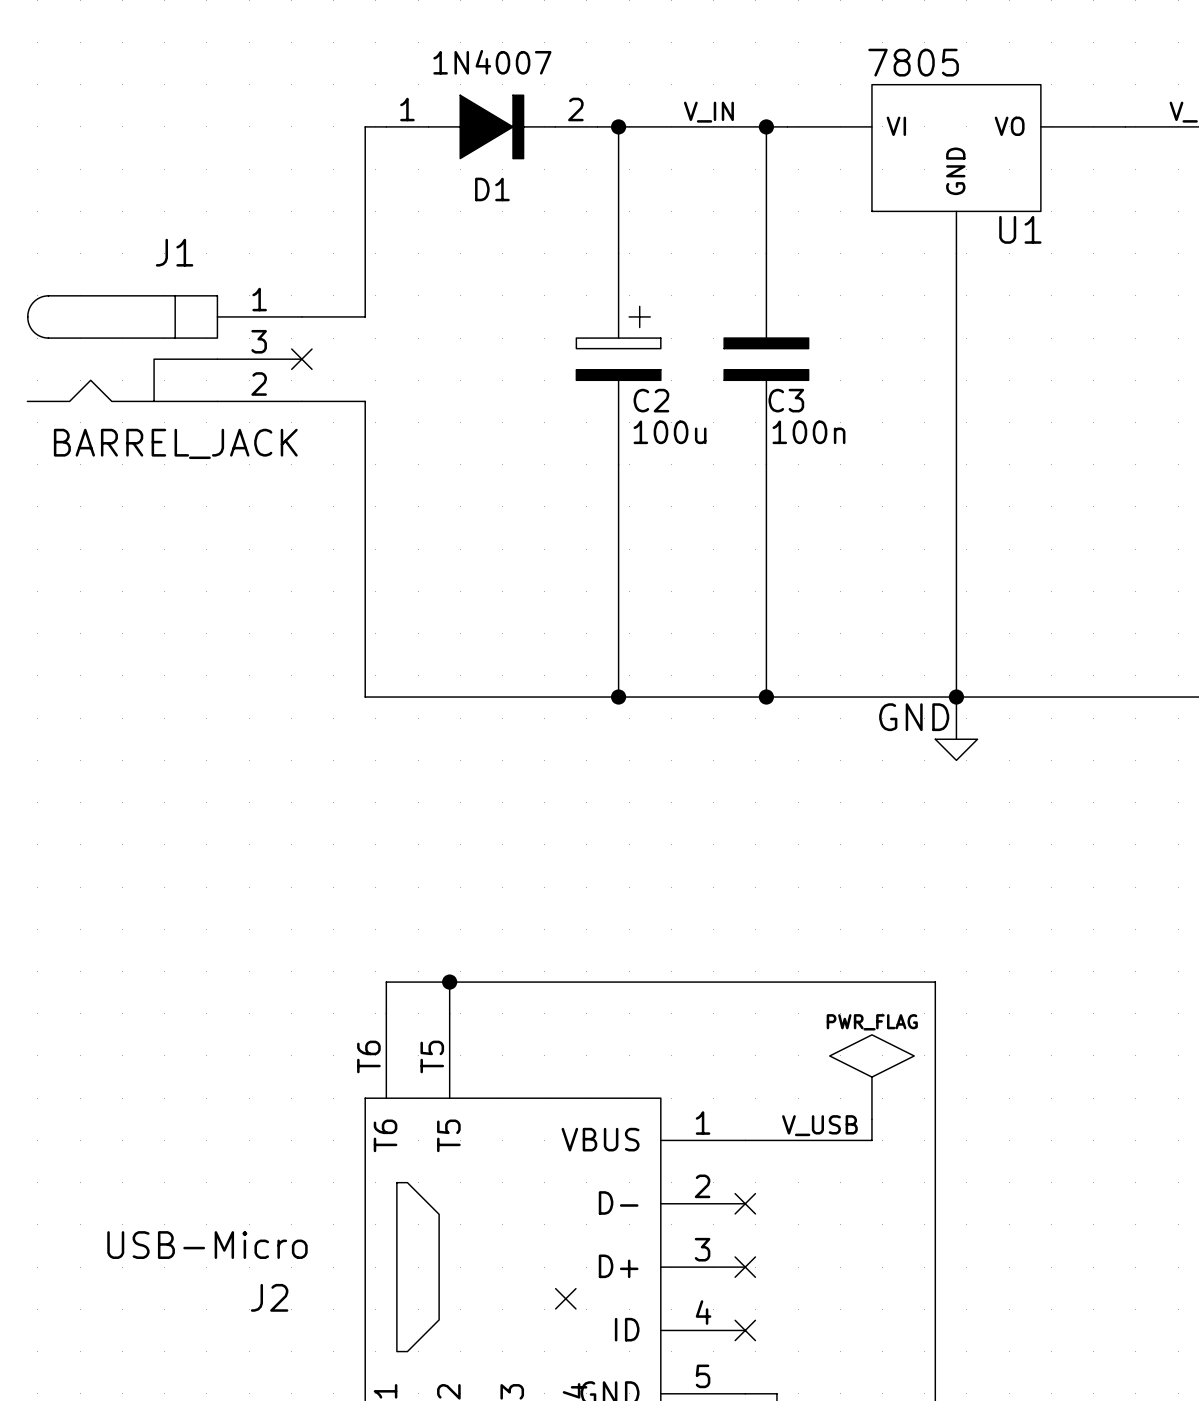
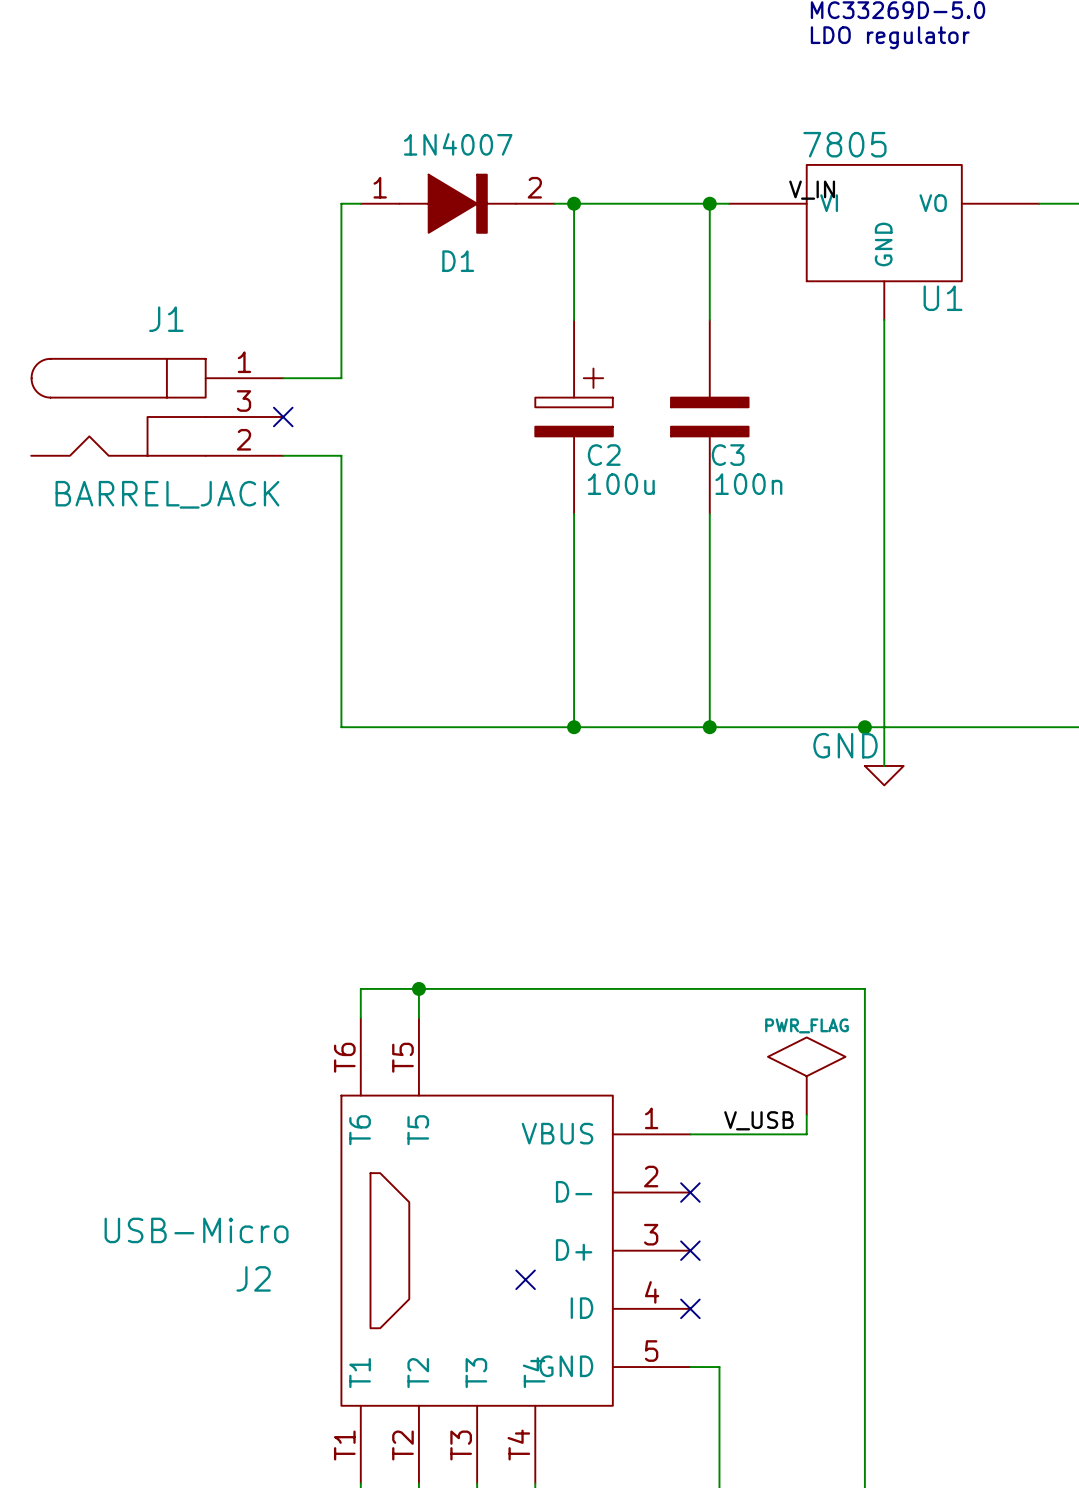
label position: V_IN (708, 112) -> V_IN (812, 190)
junction position: (956, 697) -> (864, 727)

